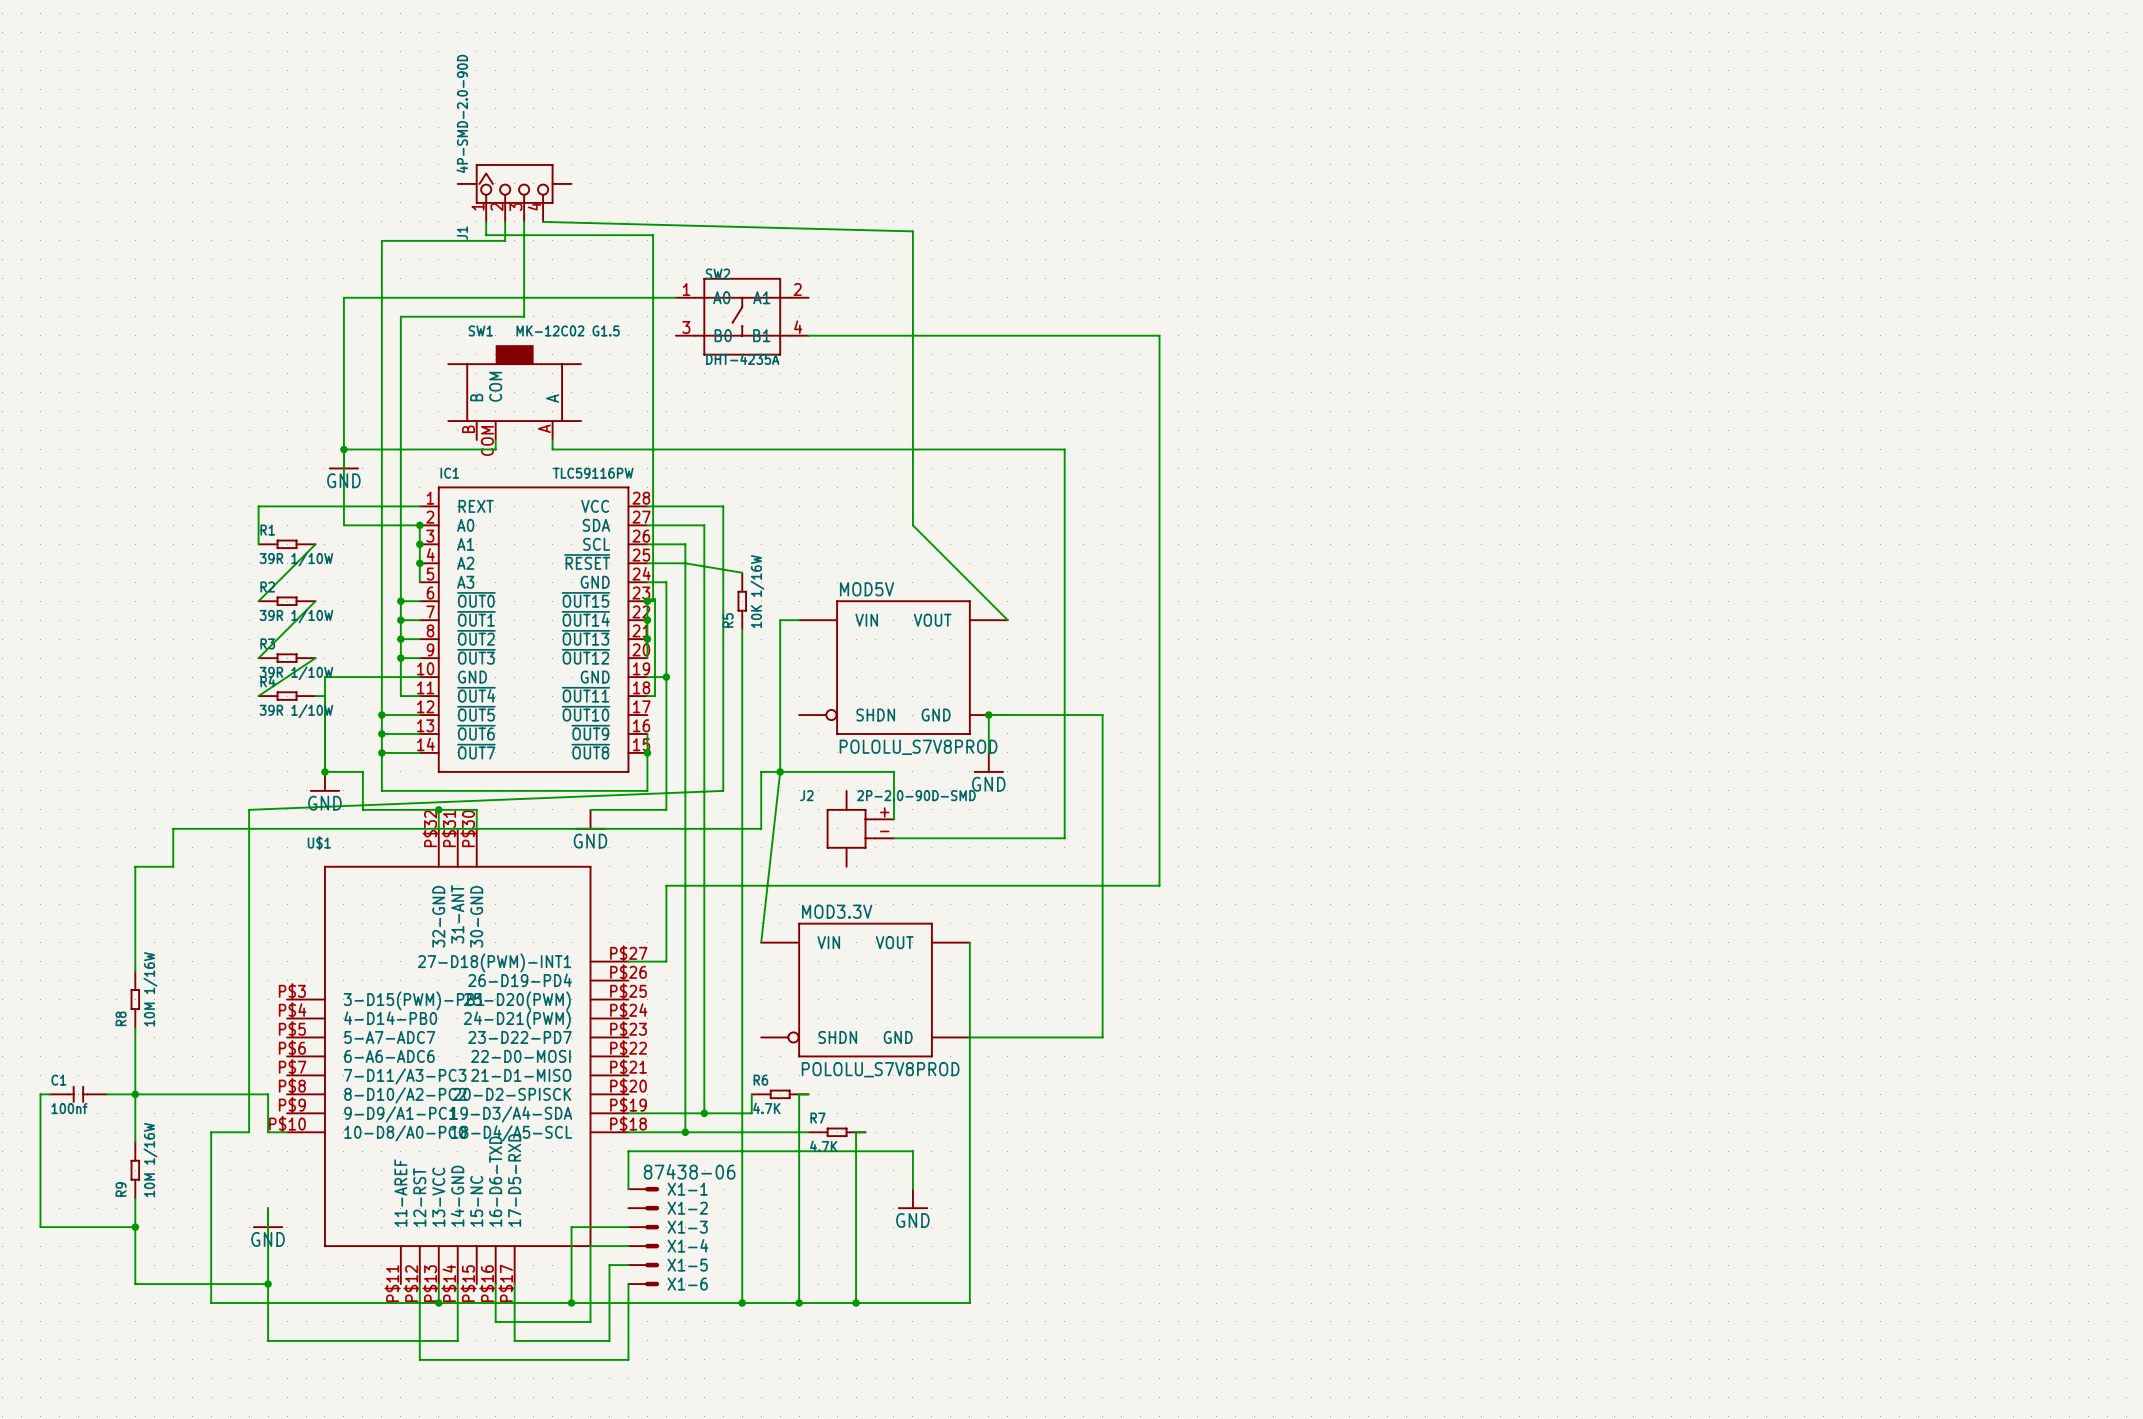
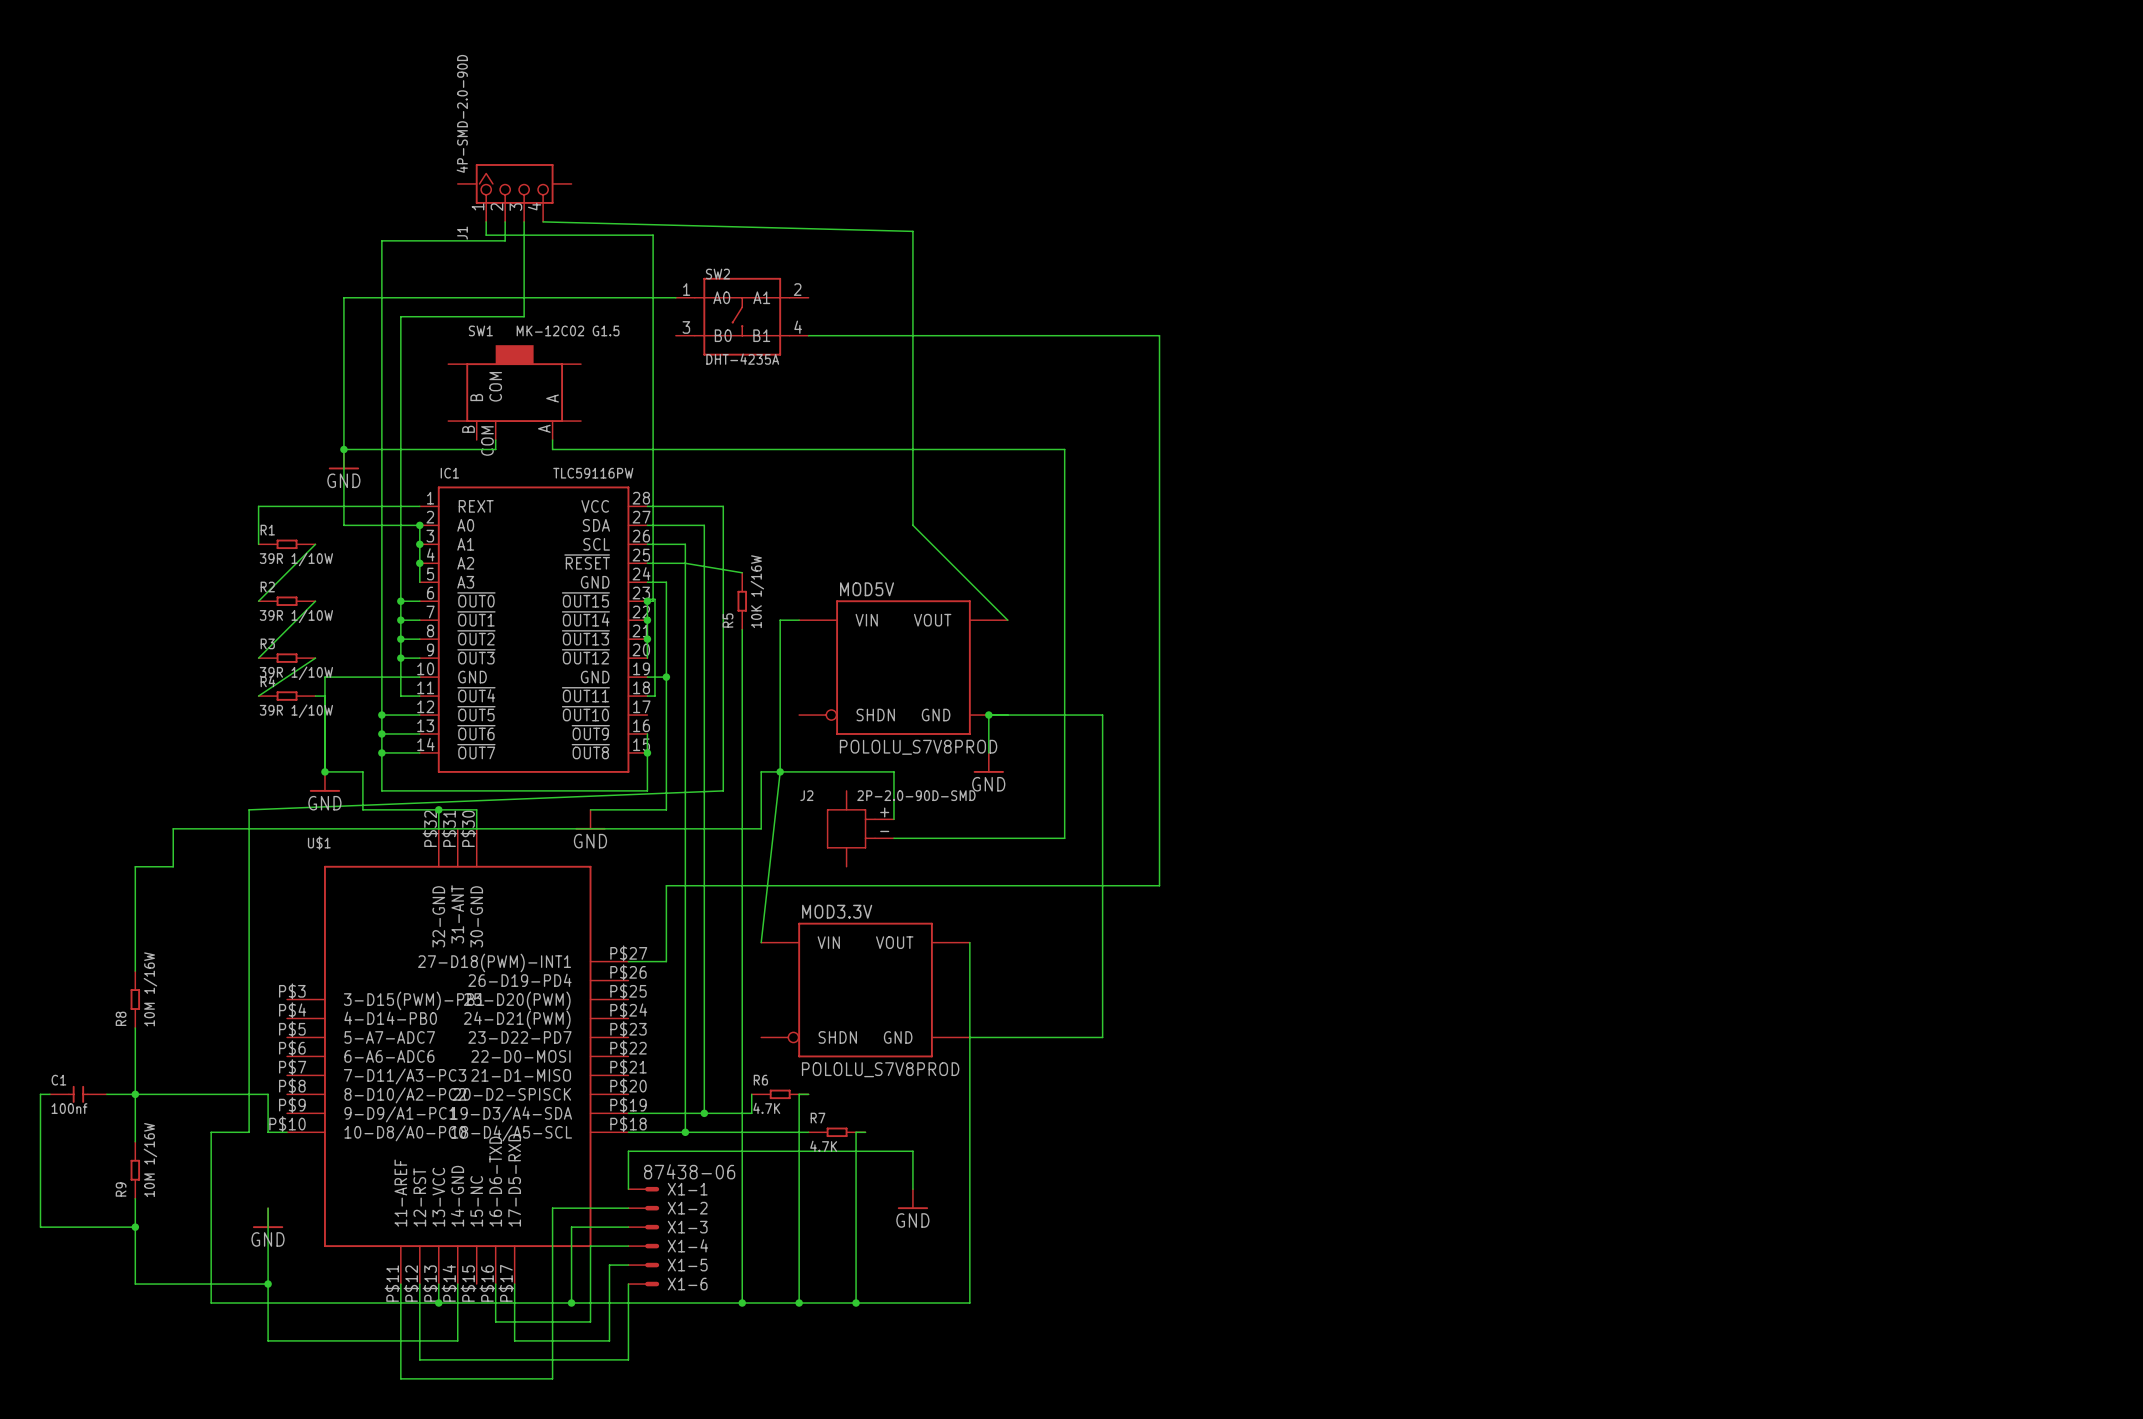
wire: none -> (628, 1208) (552, 1208) (552, 1378) (400, 1378) (400, 1284)

